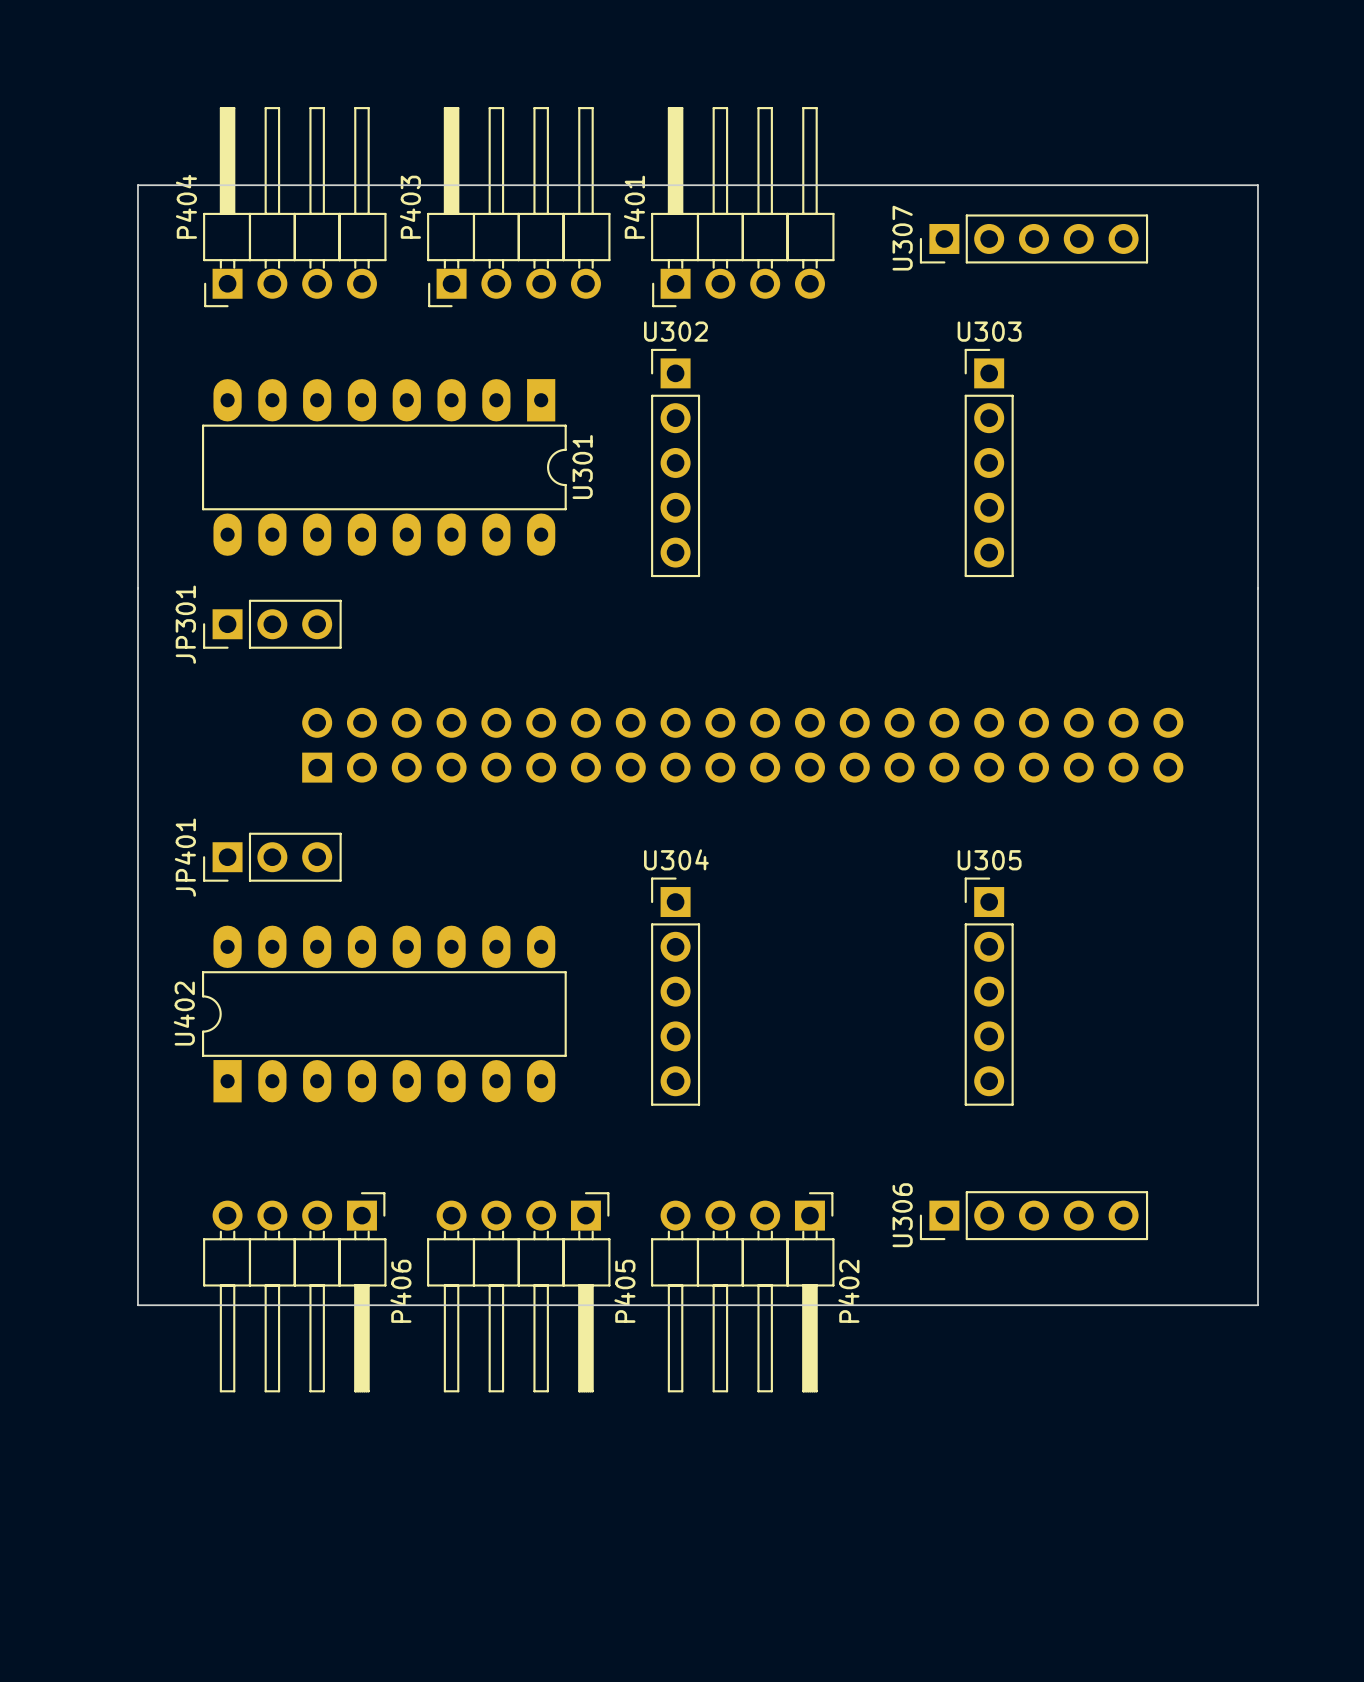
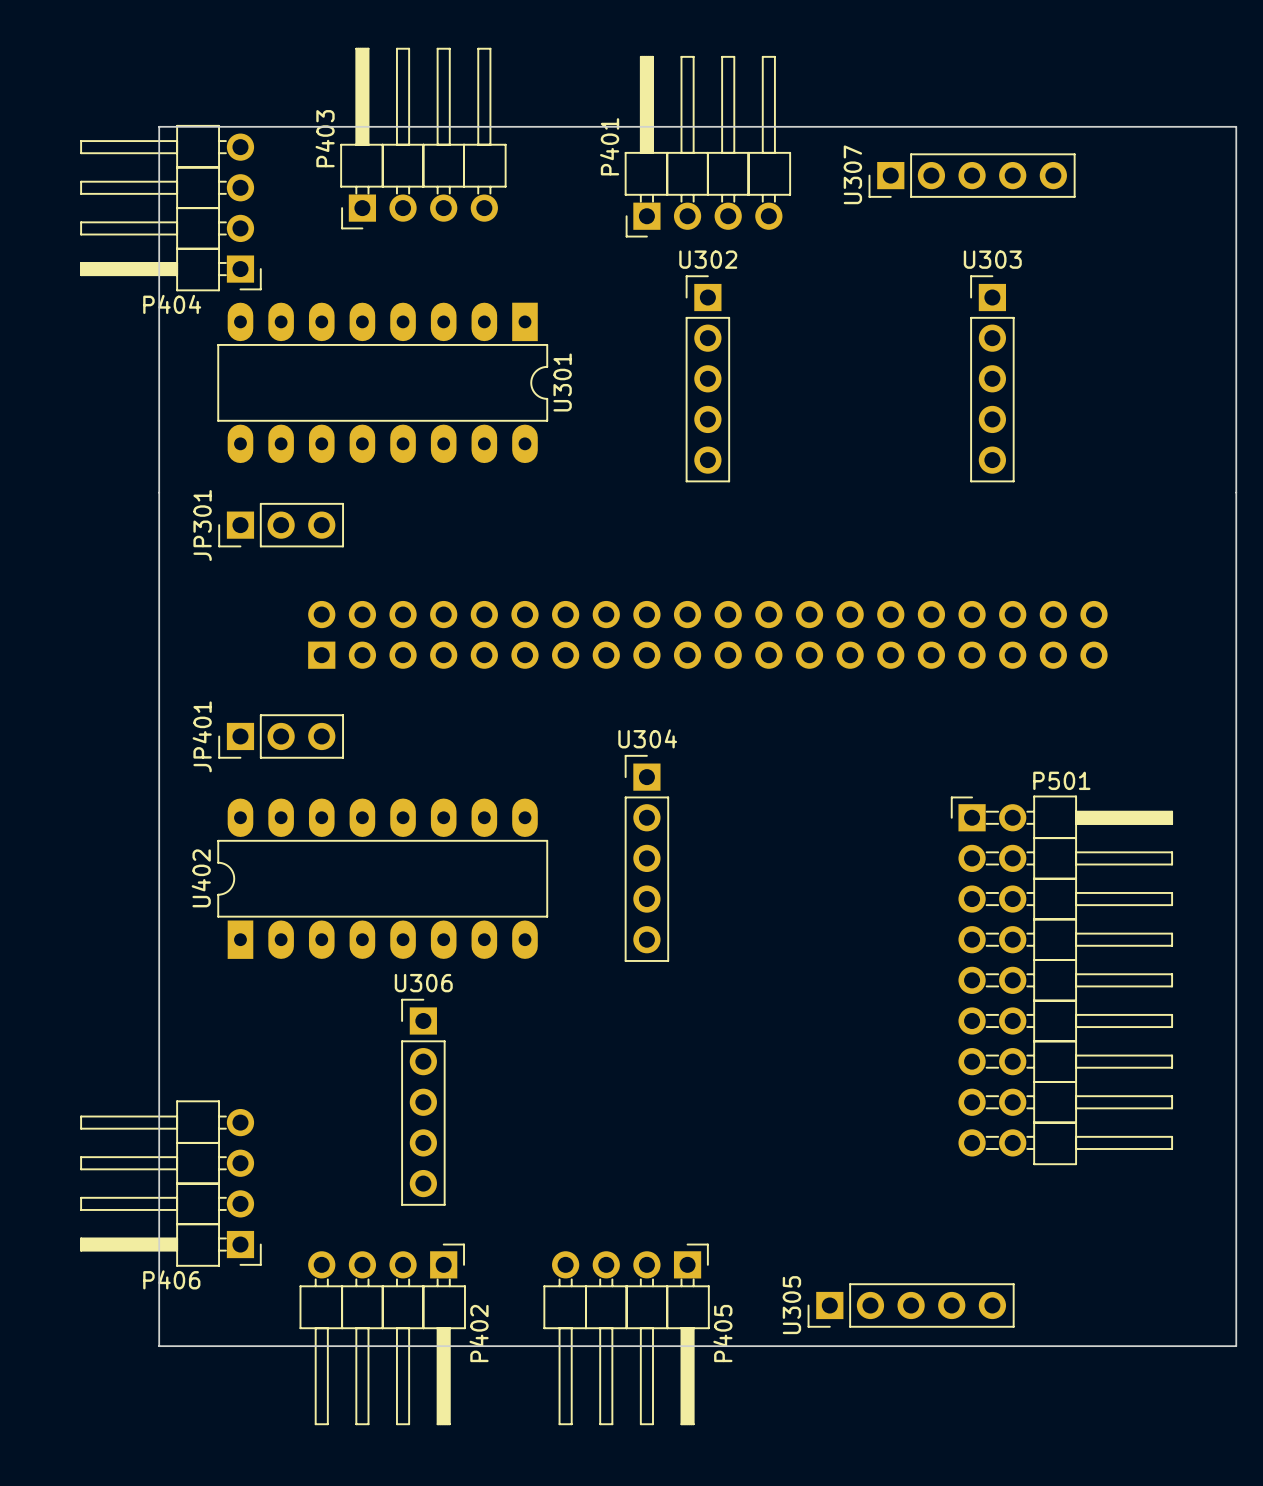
board edge: (1257, 185) (1257, 1305) (137, 1305) -> (1175, 126) (1236, 126) (1236, 1346) (159, 1346) (159, 1142)
P404 rotation: 0° (294, 207) -> 90° counterclockwise (170, 208)
P404 position: (294, 207) -> (170, 208)
P403 position: (518, 207) -> (423, 138)
U302 position: (675, 462) -> (707, 378)
U303 position: (989, 462) -> (992, 378)
U305 rotation: 0° (989, 991) -> 90° counterclockwise (911, 1305)
U305 position: (989, 991) -> (911, 1305)
P501: none -> (1061, 980)
U306 rotation: 0° (1033, 1215) -> 90° clockwise (423, 1102)
U306 position: (1033, 1215) -> (423, 1102)
P406 rotation: 0° (294, 1292) -> 90° clockwise (170, 1183)
P406 position: (294, 1292) -> (170, 1183)
P405 position: (518, 1292) -> (626, 1334)
P402 position: (742, 1292) -> (382, 1334)

